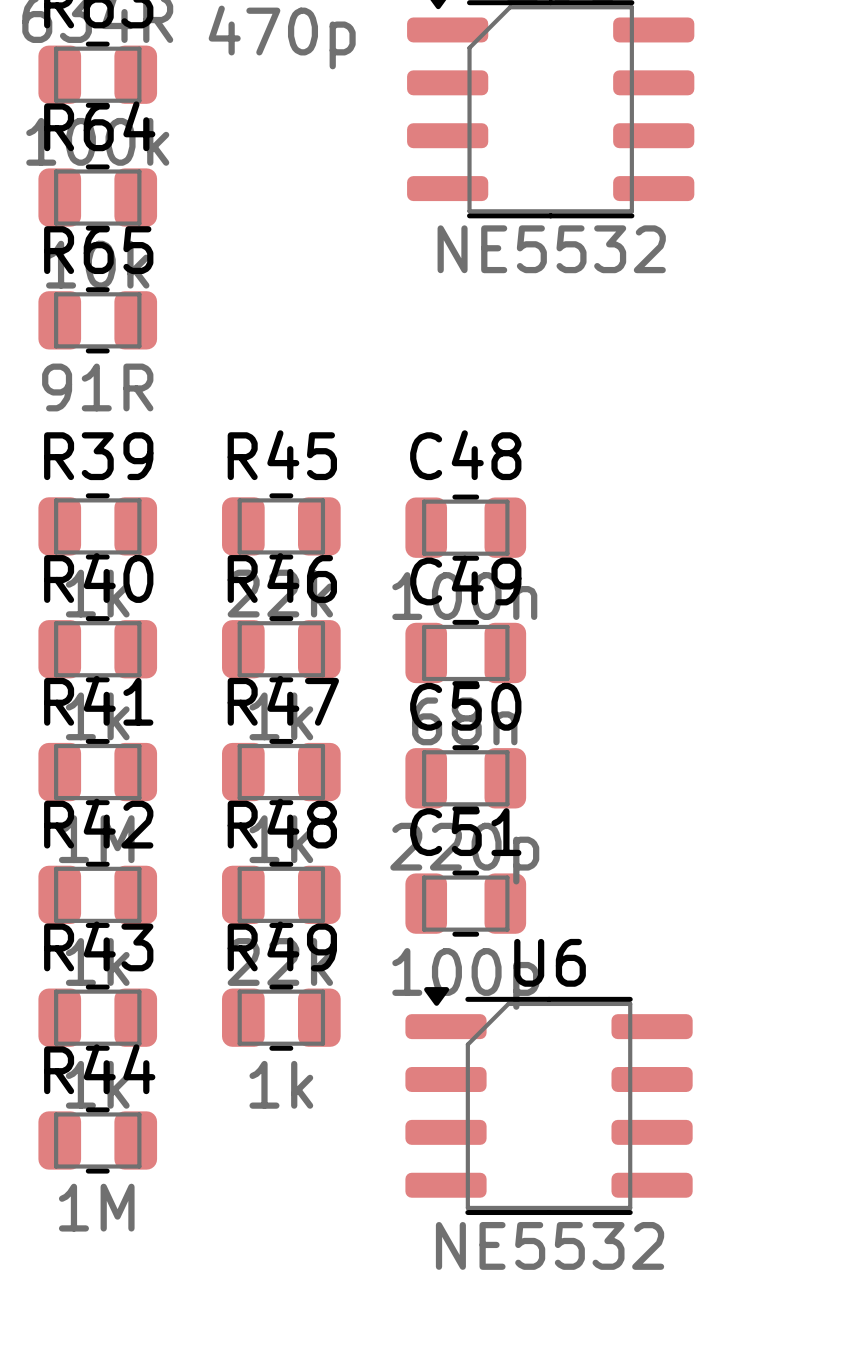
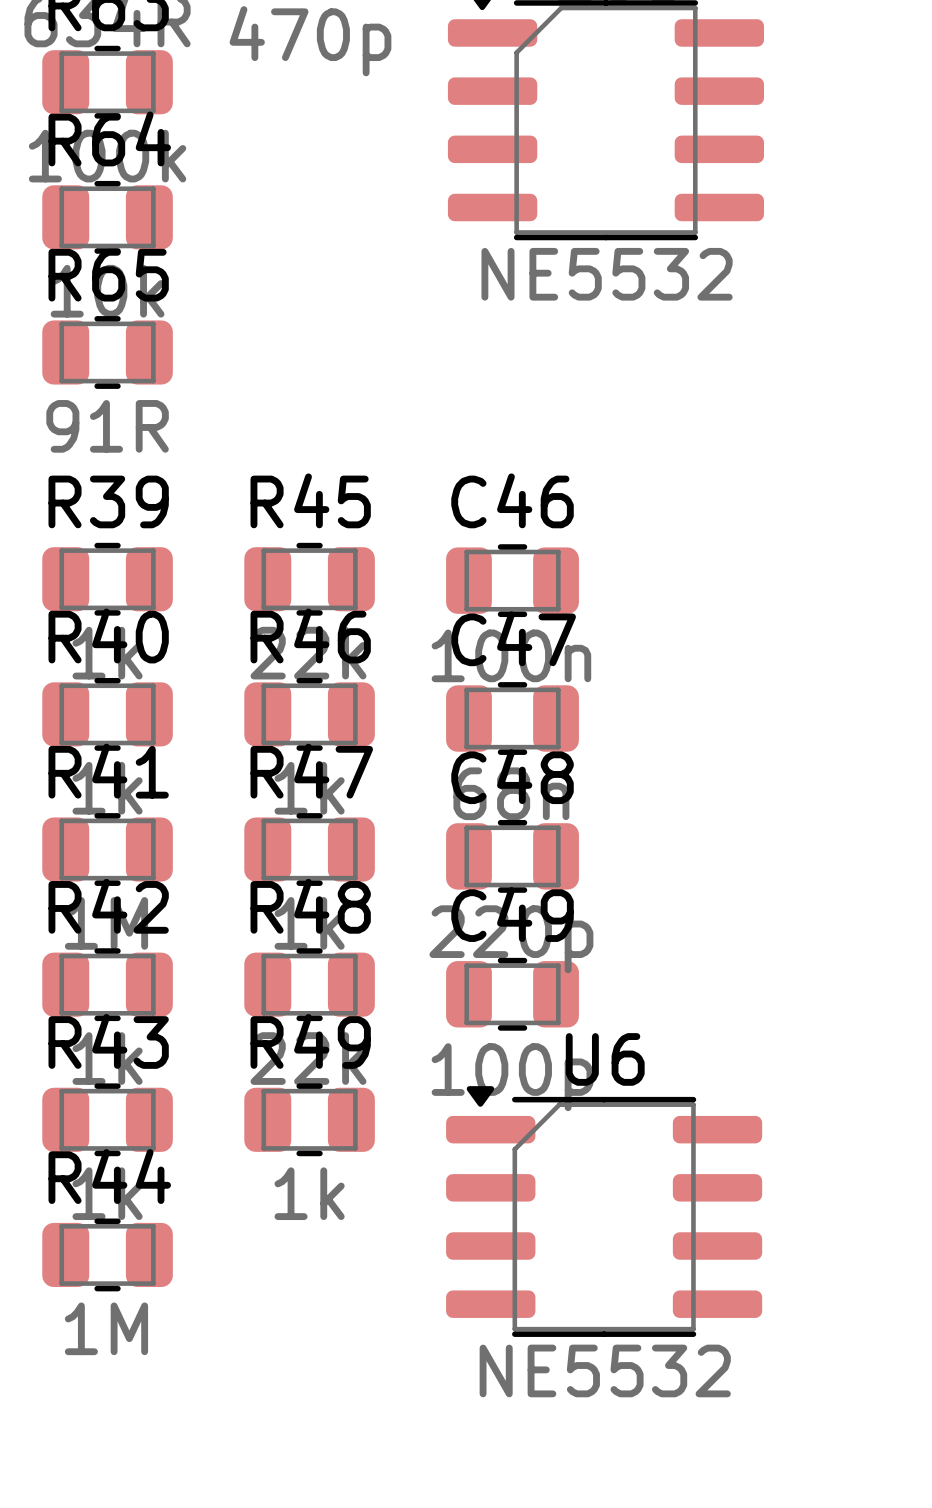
C48 name: C48 (465, 455) -> C46 (512, 500)
C49 name: C49 (465, 580) -> C47 (513, 638)
C50 name: C50 (465, 706) -> C48 (512, 776)
C51 name: C51 (465, 832) -> C49 (512, 914)

